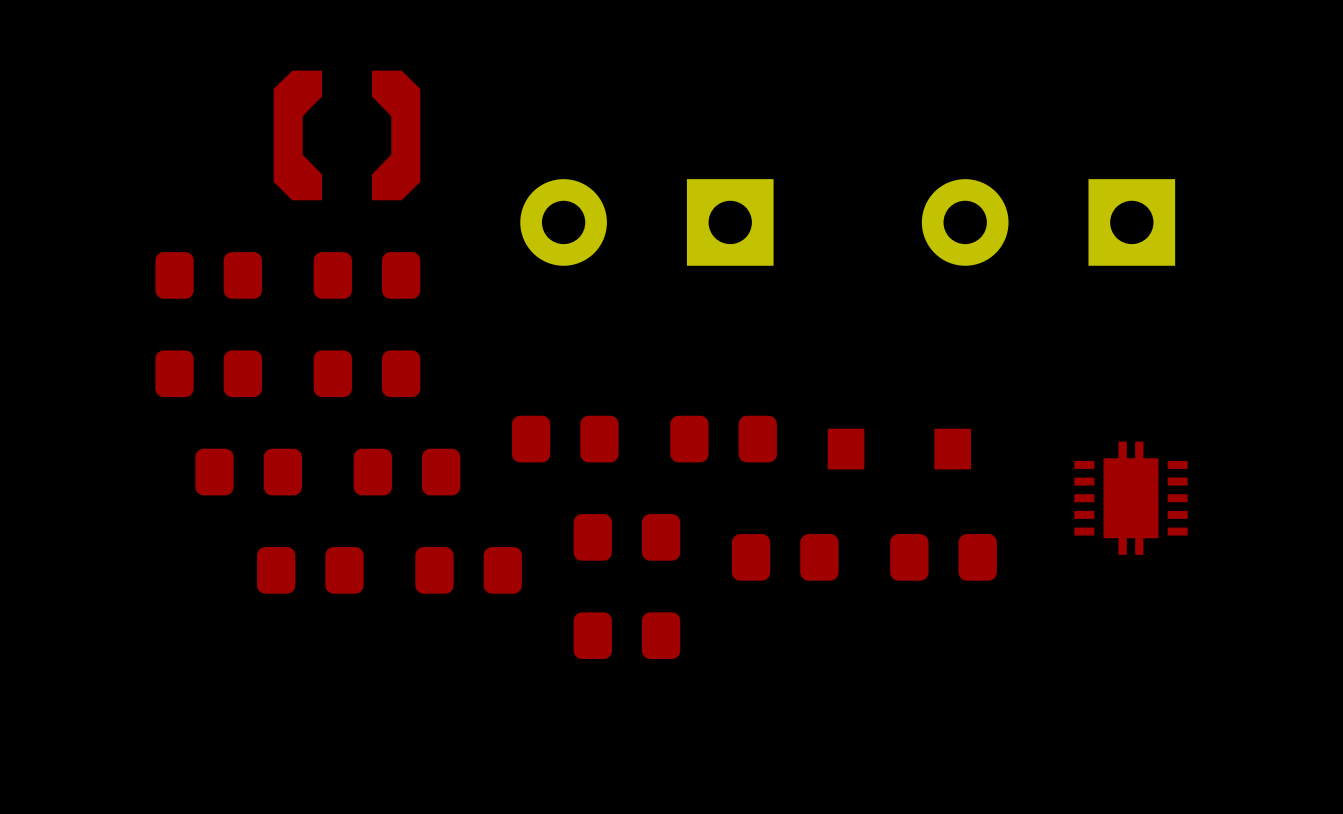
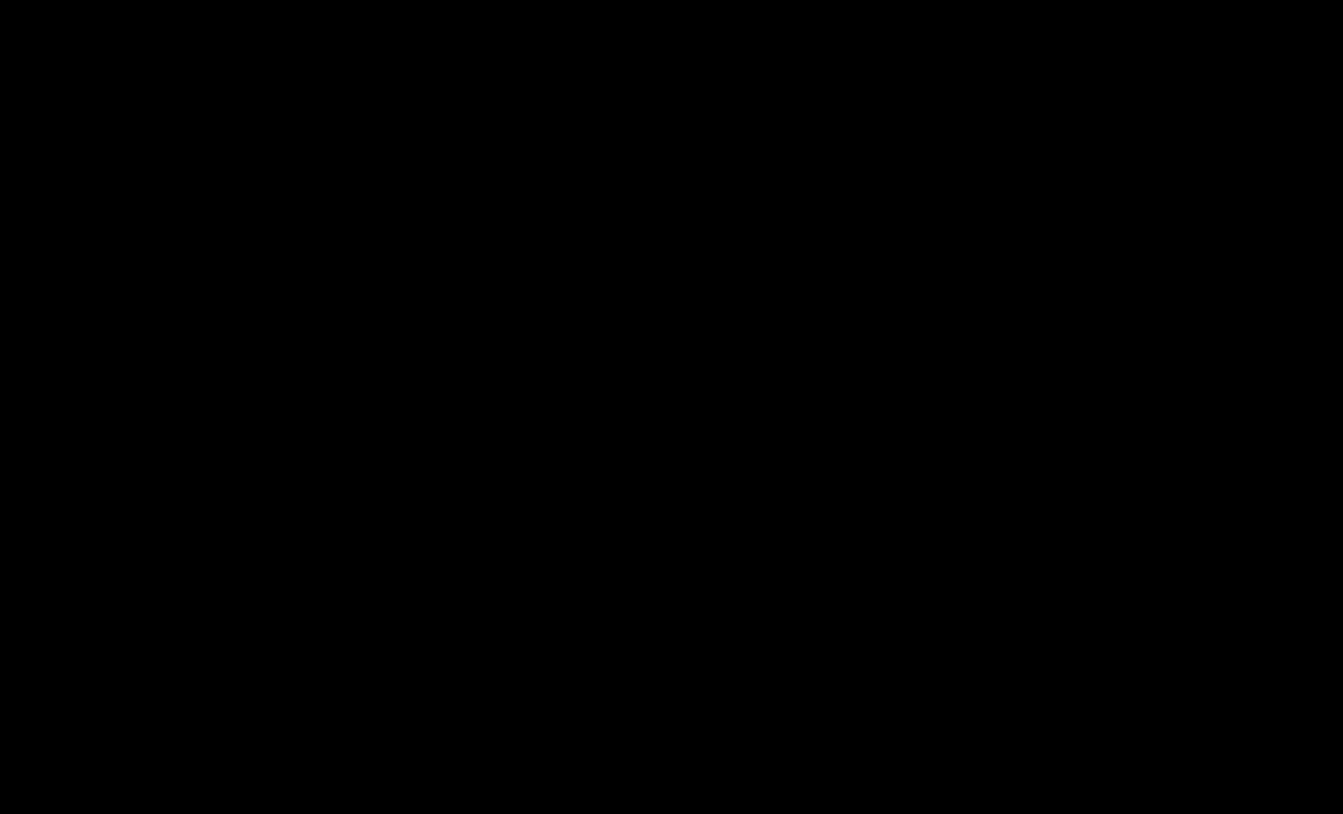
part: (346, 135) -> none
part: (646, 222) -> none
part: (1048, 222) -> none
part: (208, 275) -> none
part: (366, 275) -> none
part: (208, 373) -> none
part: (366, 373) -> none
part: (565, 439) -> none
part: (723, 439) -> none
part: (899, 449) -> none
part: (248, 472) -> none
part: (406, 472) -> none
part: (1130, 498) -> none
part: (626, 537) -> none
part: (785, 557) -> none
part: (943, 557) -> none
part: (310, 570) -> none
part: (468, 570) -> none
part: (626, 635) -> none

